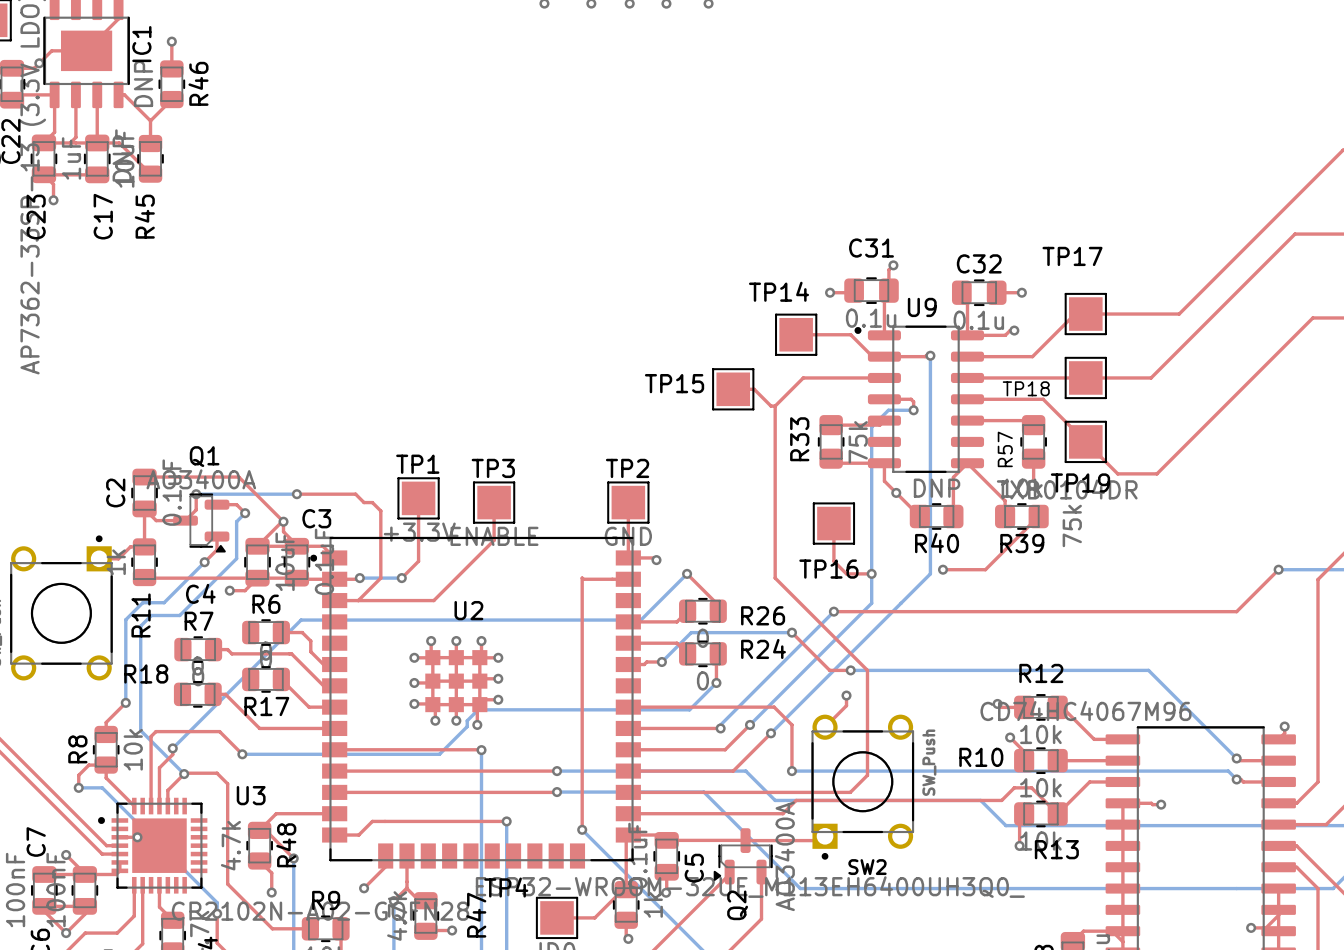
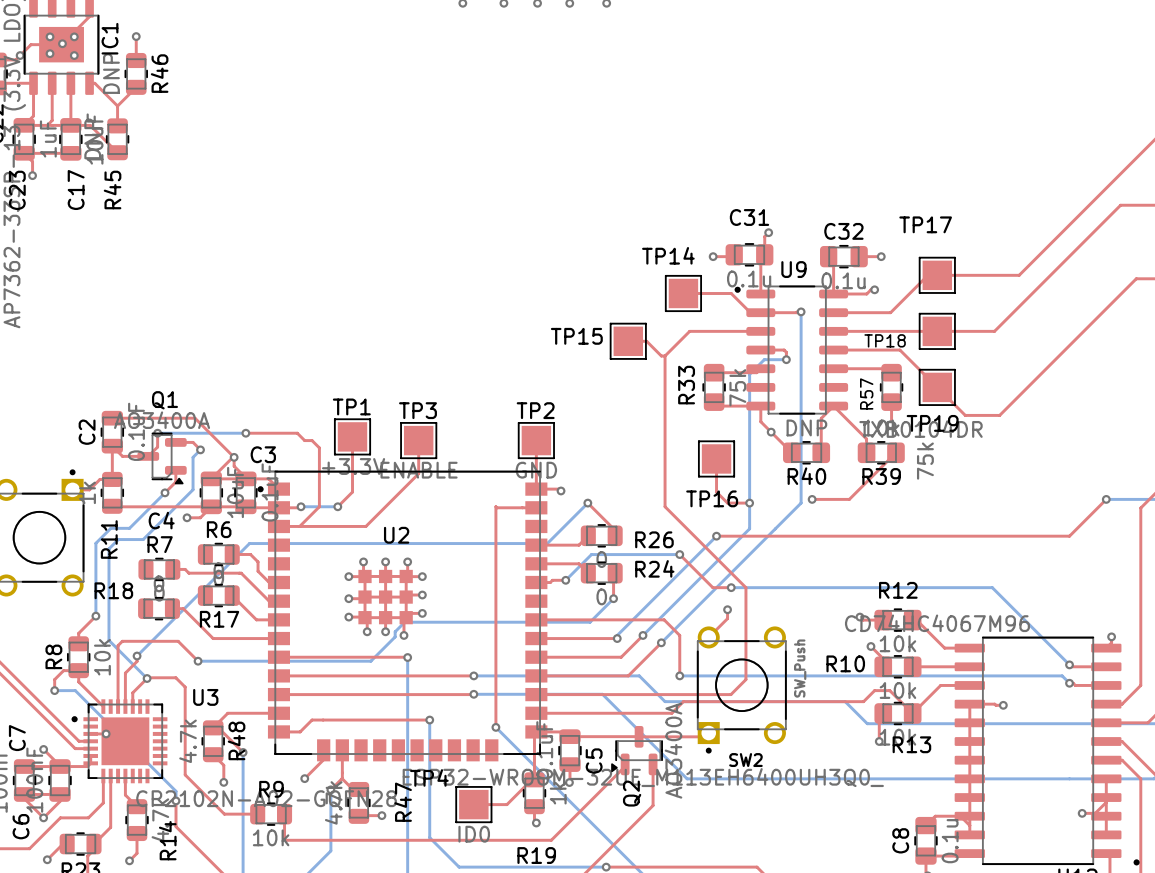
via: none -> (50, 36)
via: none -> (74, 36)
via: none -> (62, 43)
via: none -> (50, 53)
via: none -> (74, 55)

